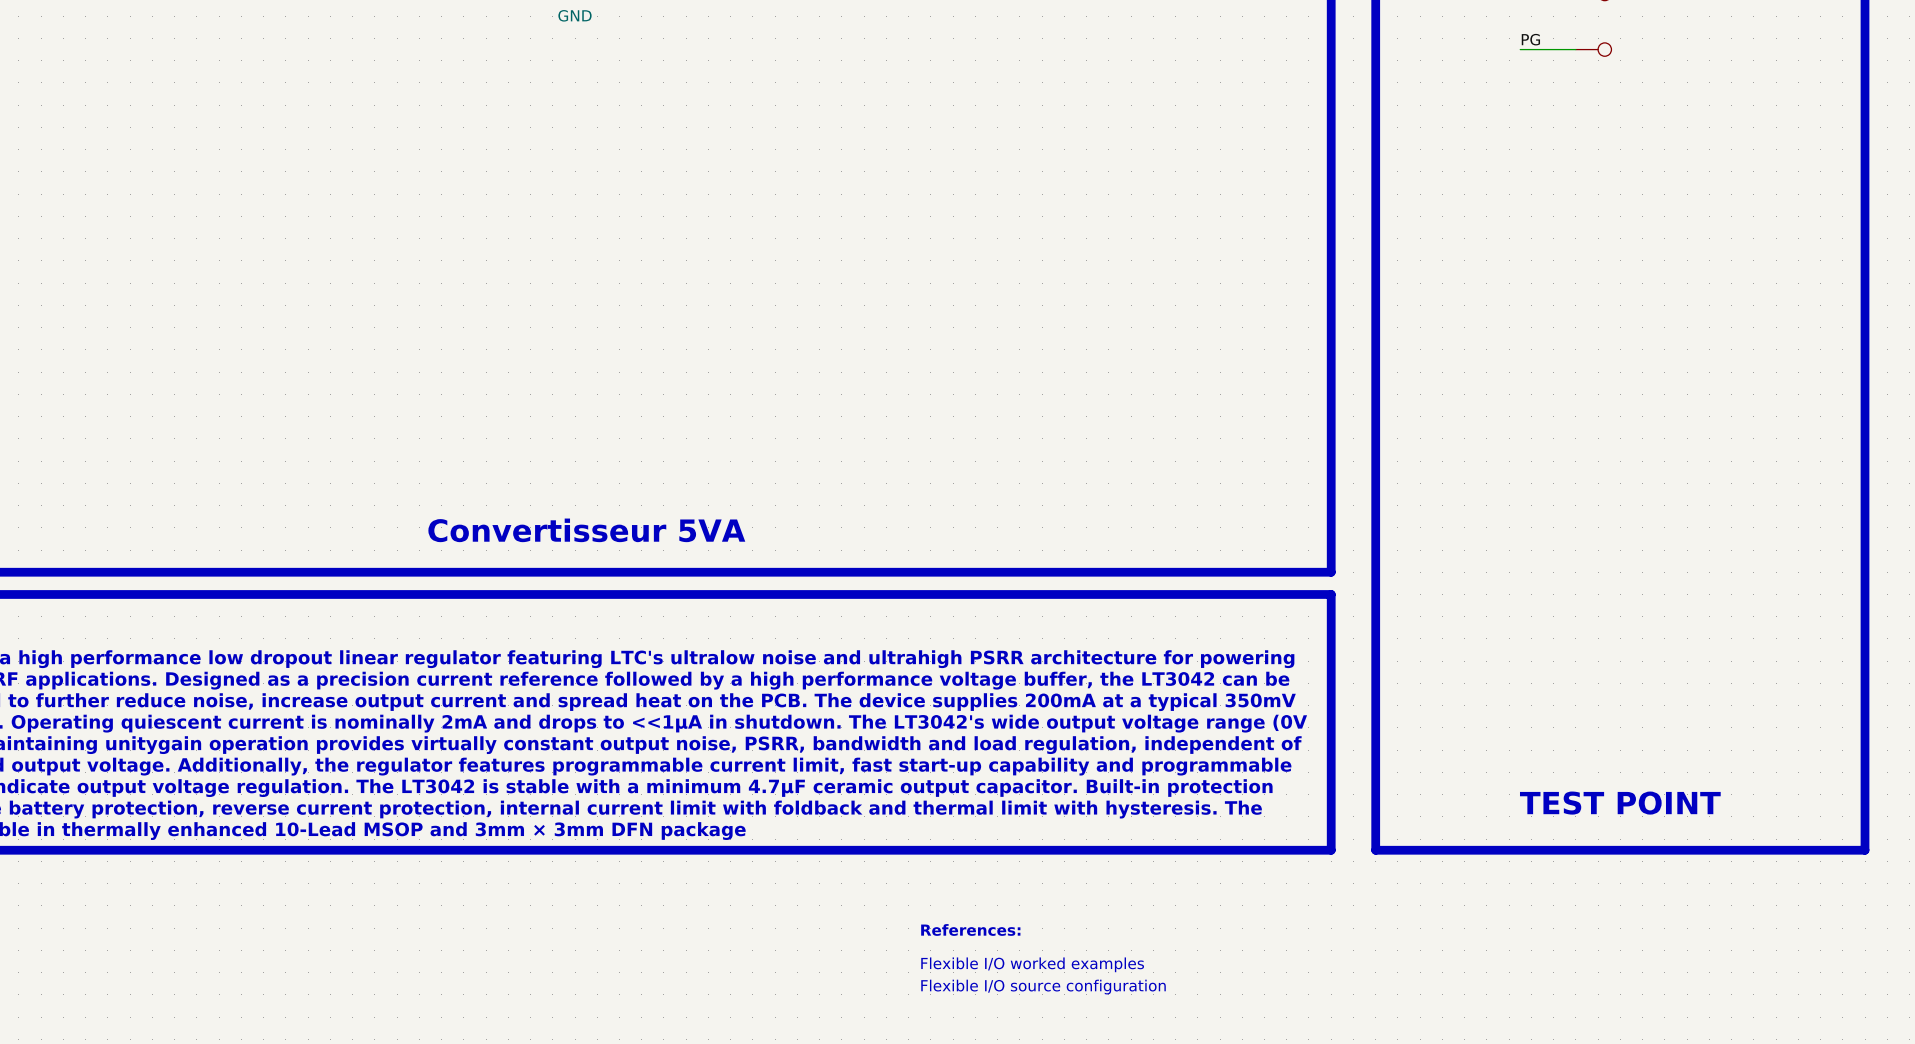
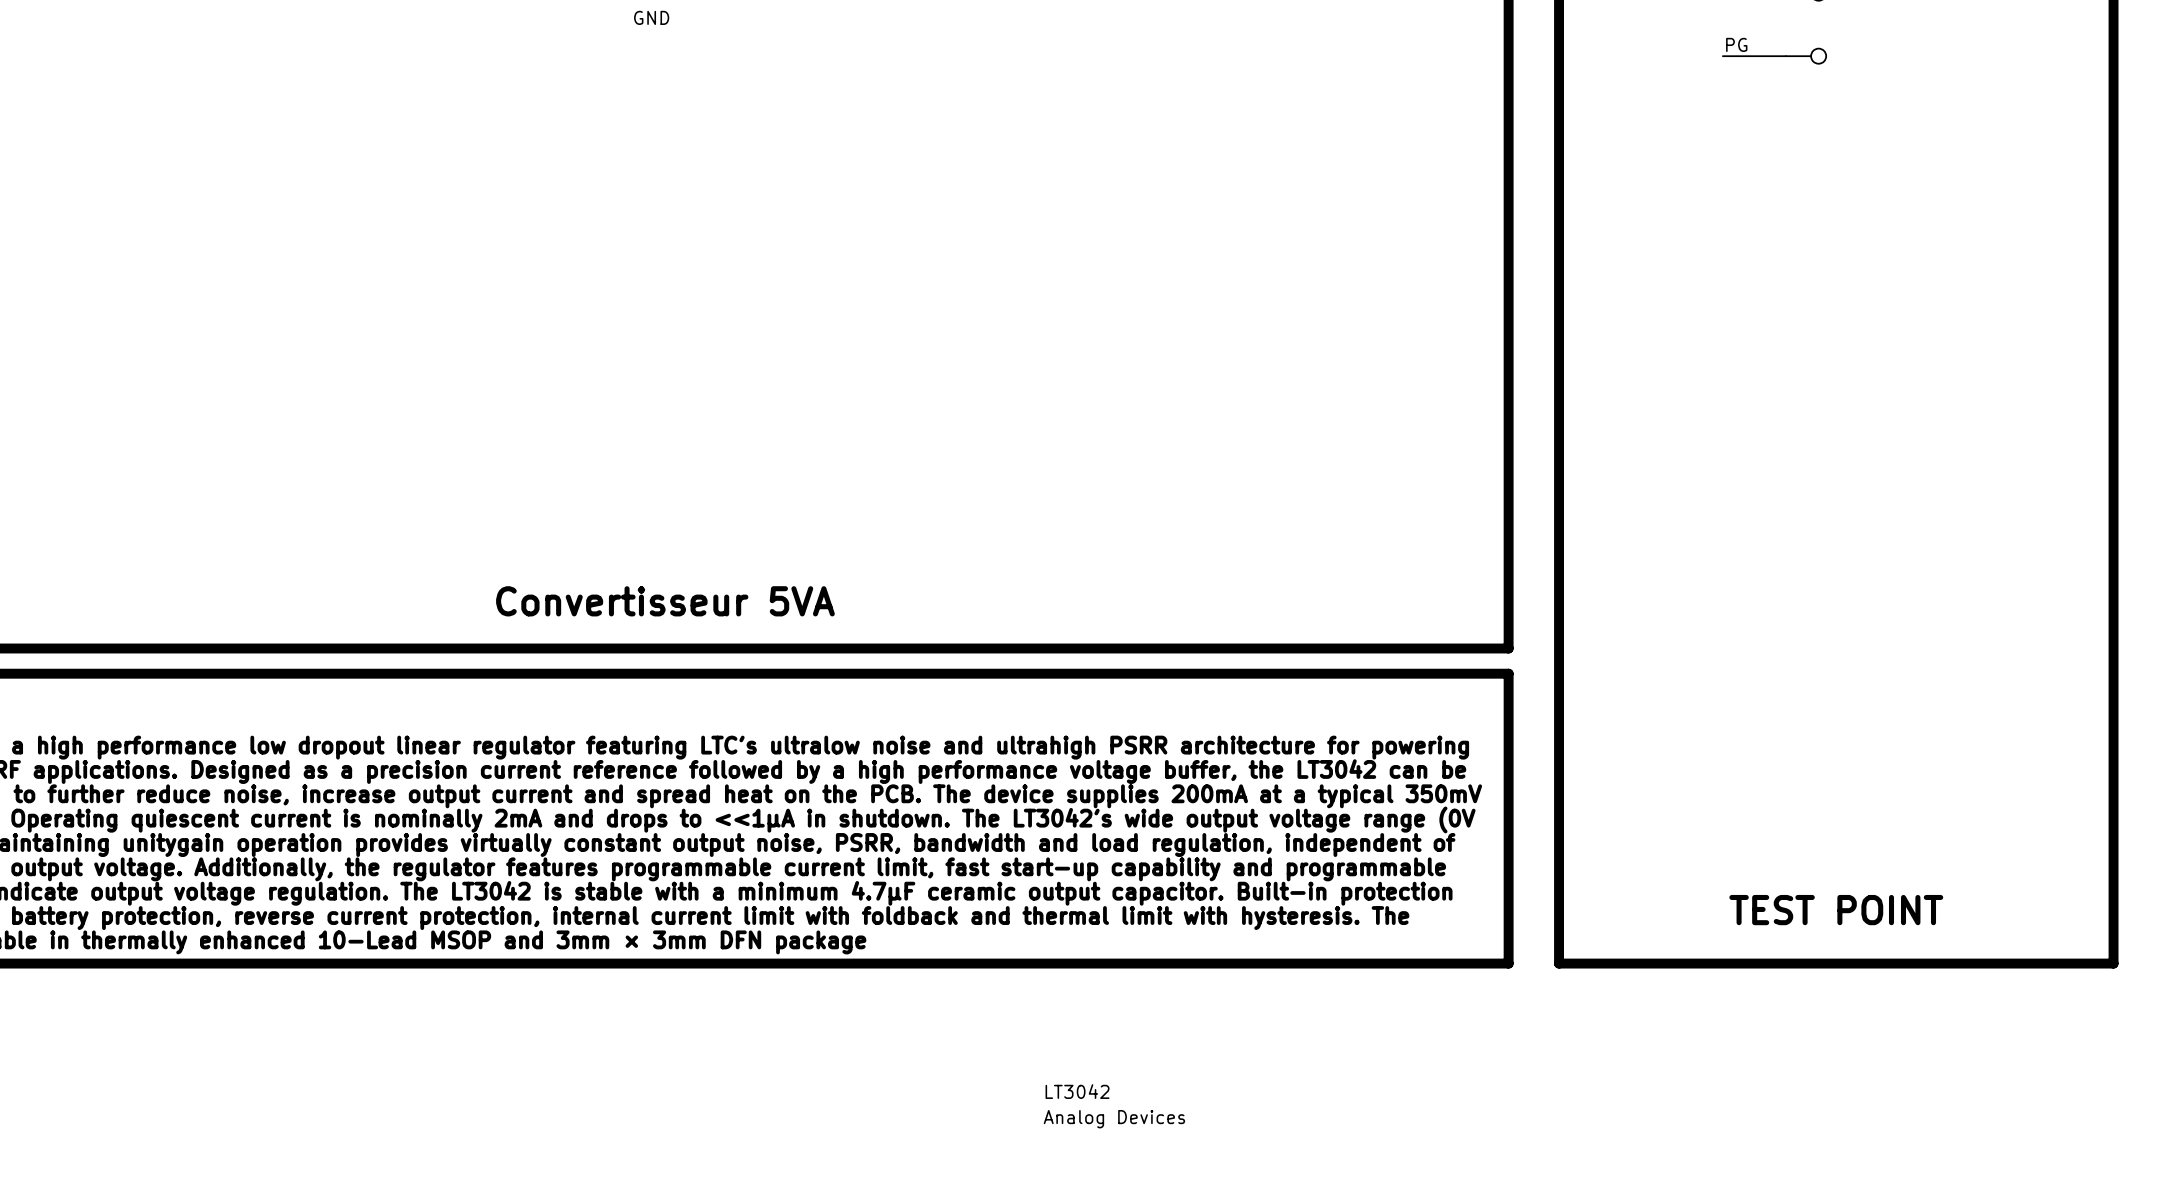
text: References: (970, 929) -> none
text: Flexible I/O worked examples (1032, 964) -> LT3042 (1077, 1091)
text: Flexible I/O source configuration (1043, 987) -> Analog Devices (1114, 1119)

